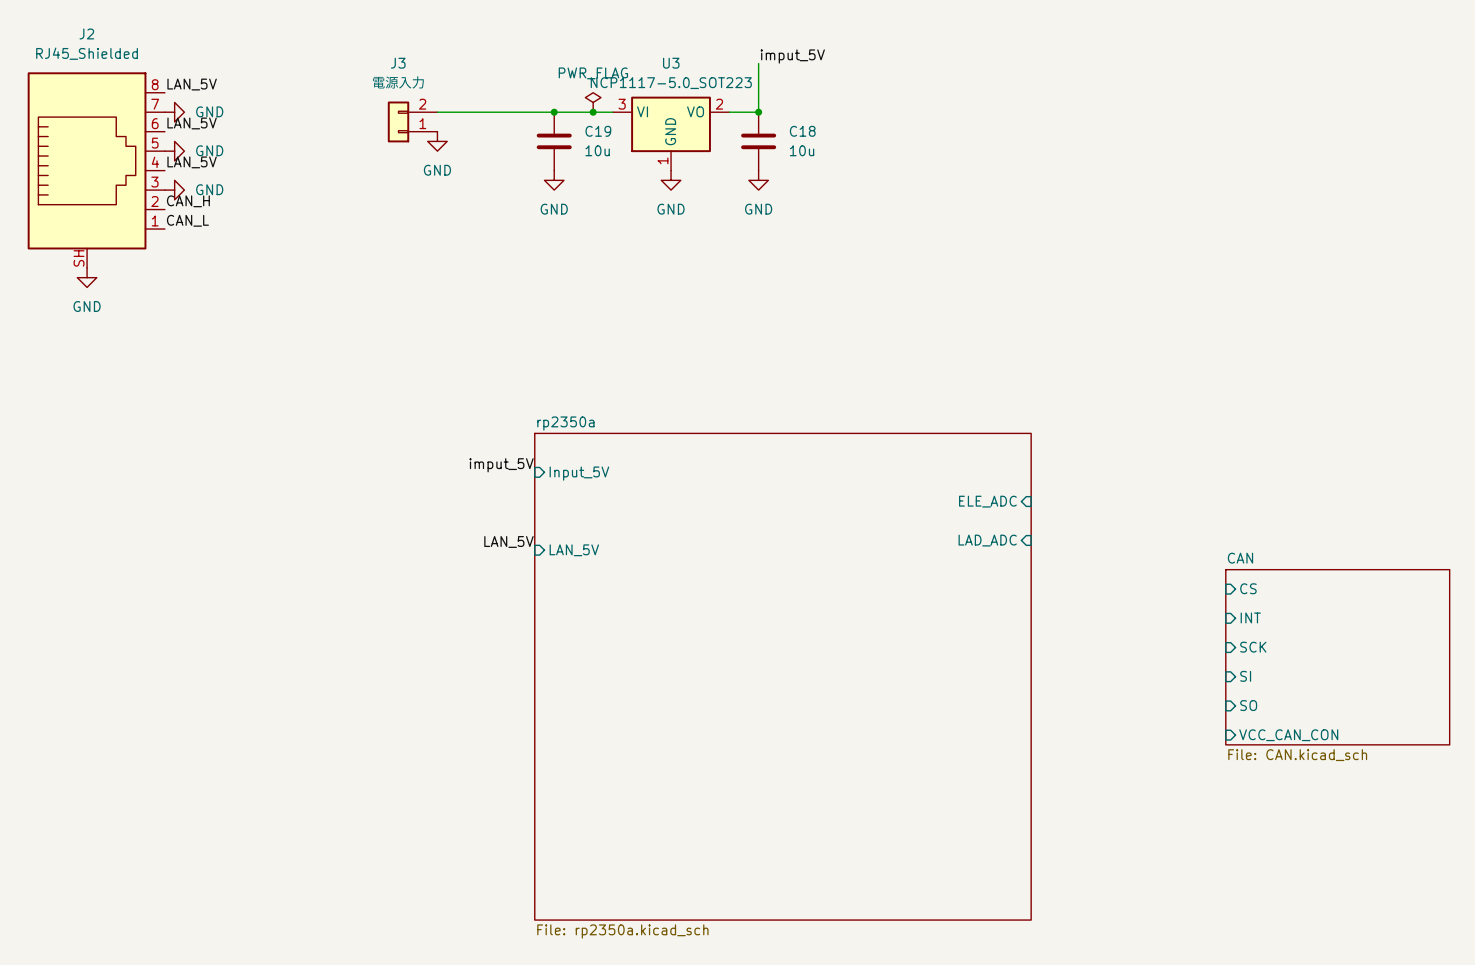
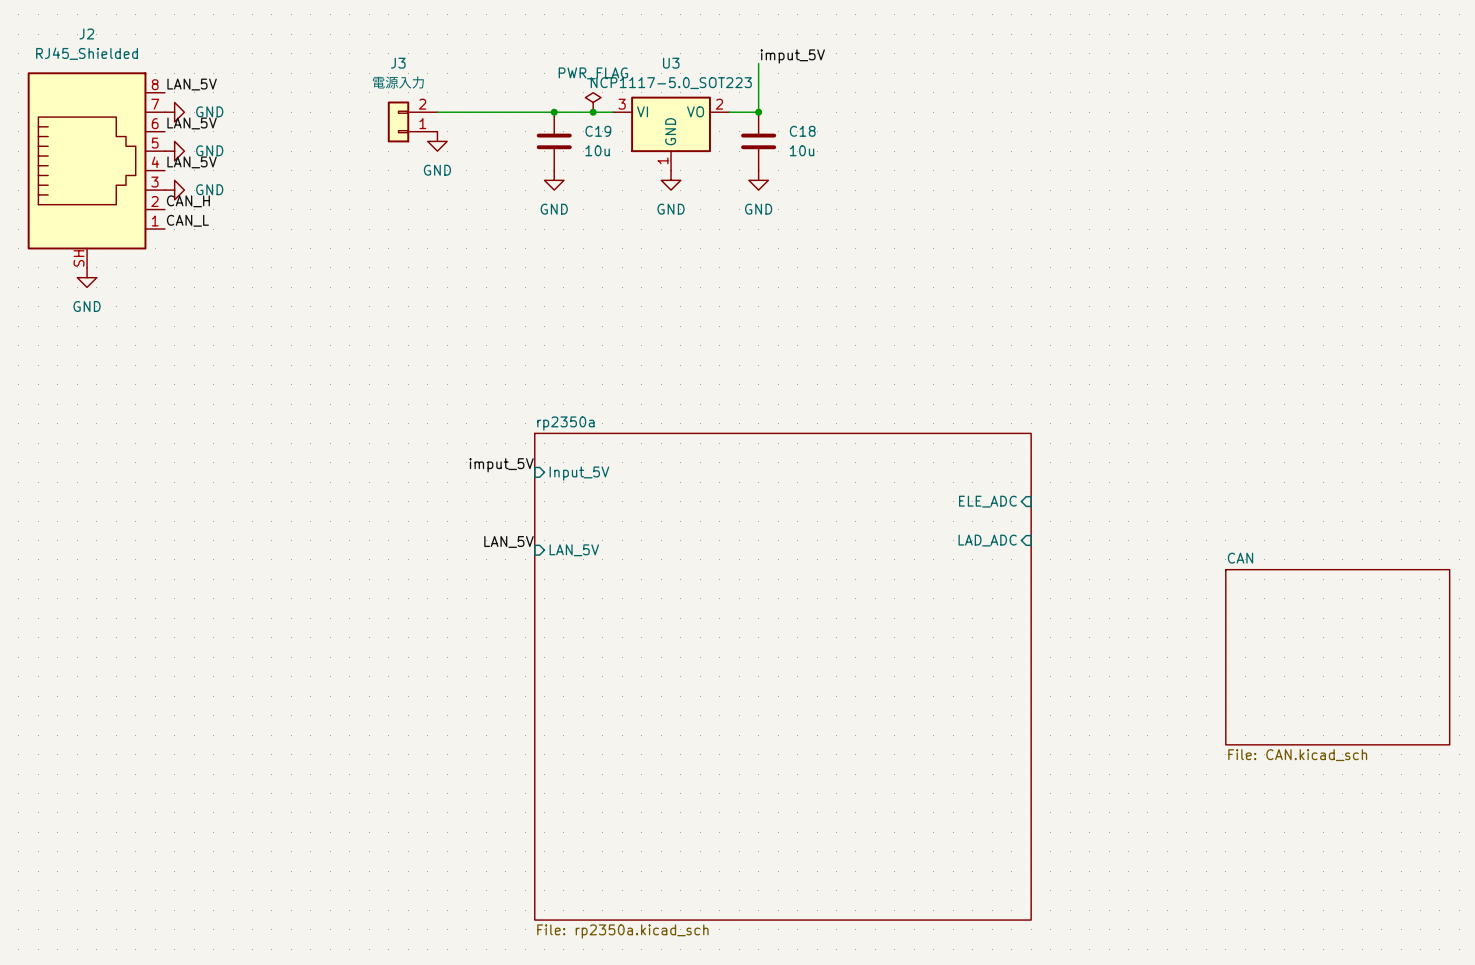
sheet pin: CS (1248, 588) -> none
sheet pin: INT (1250, 617) -> none
sheet pin: SCK (1253, 647) -> none
sheet pin: SI (1245, 676) -> none
sheet pin: SO (1248, 705) -> none
sheet pin: VCC_CAN_CON (1288, 735) -> none

